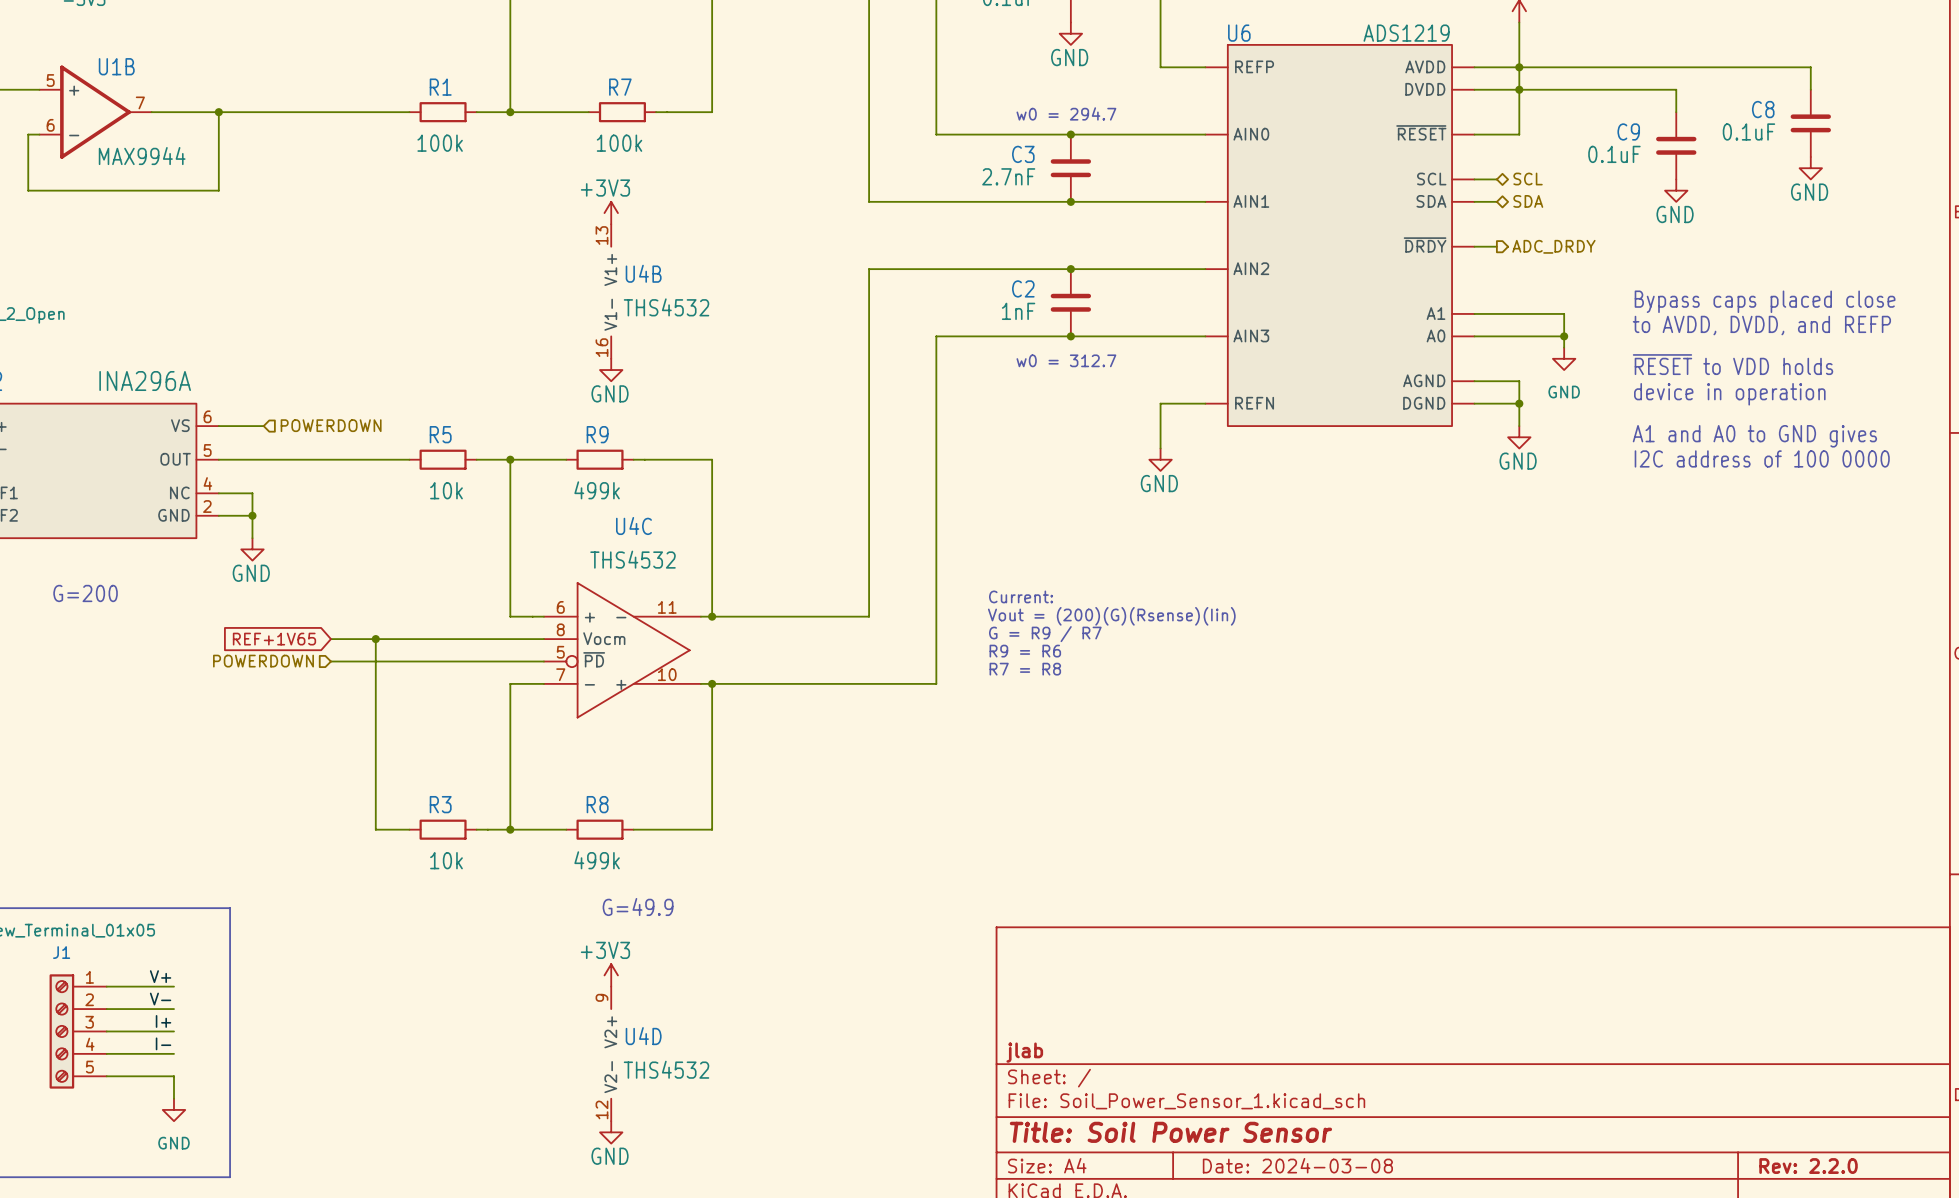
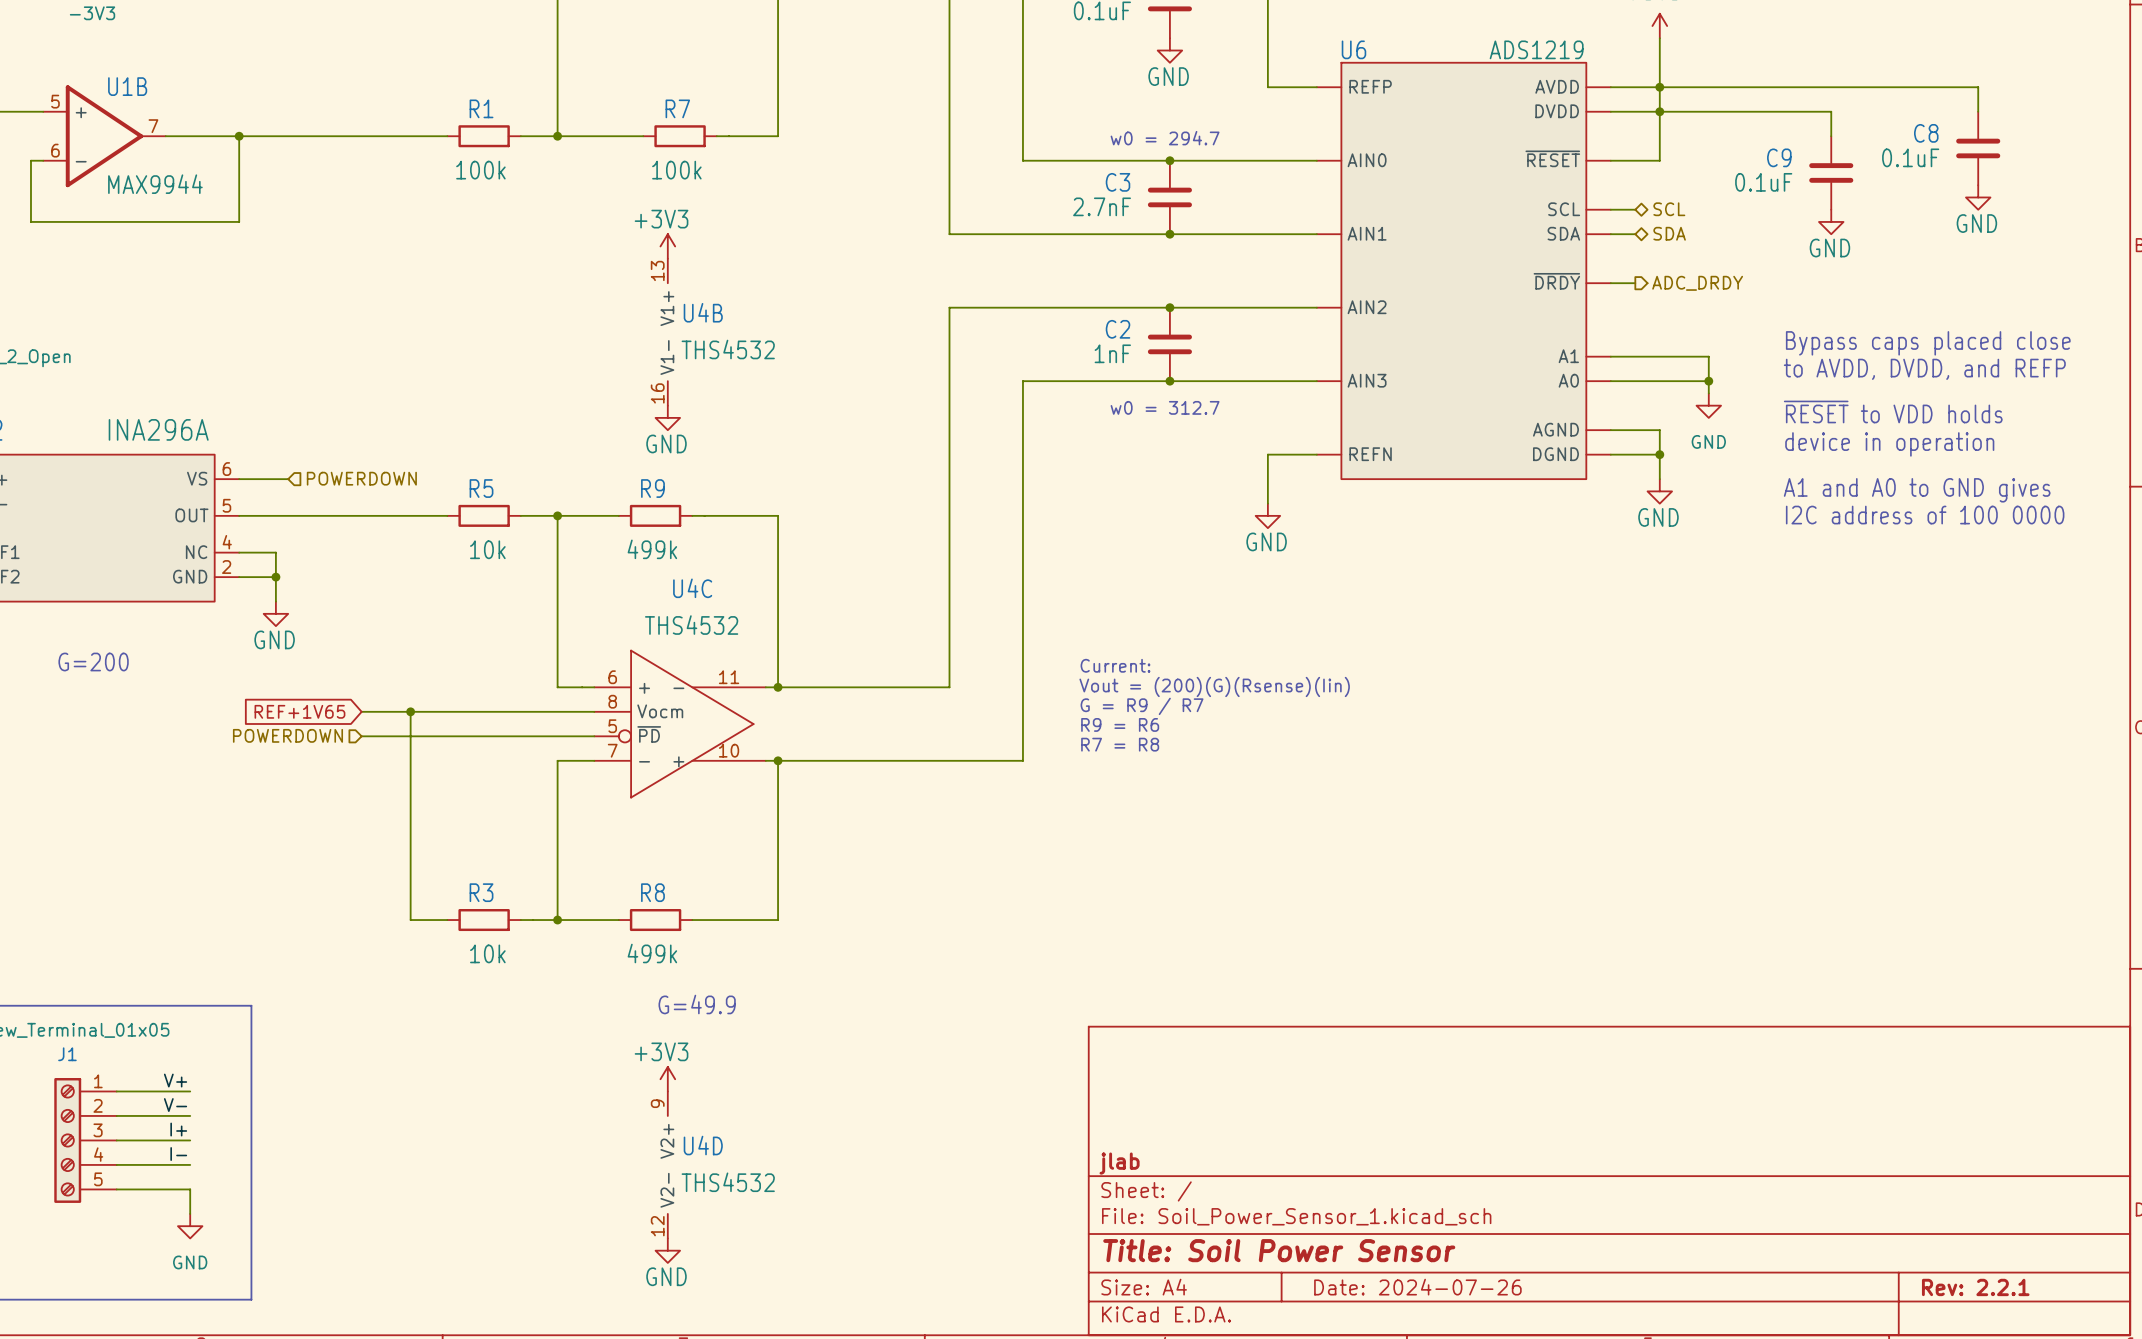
title block: Date: 2024-03-08 (1297, 1165) -> Date: 2024-07-26 (1417, 1287)
title block: Rev: 2.2.0 (1808, 1166) -> Rev: 2.2.1 (1975, 1287)

